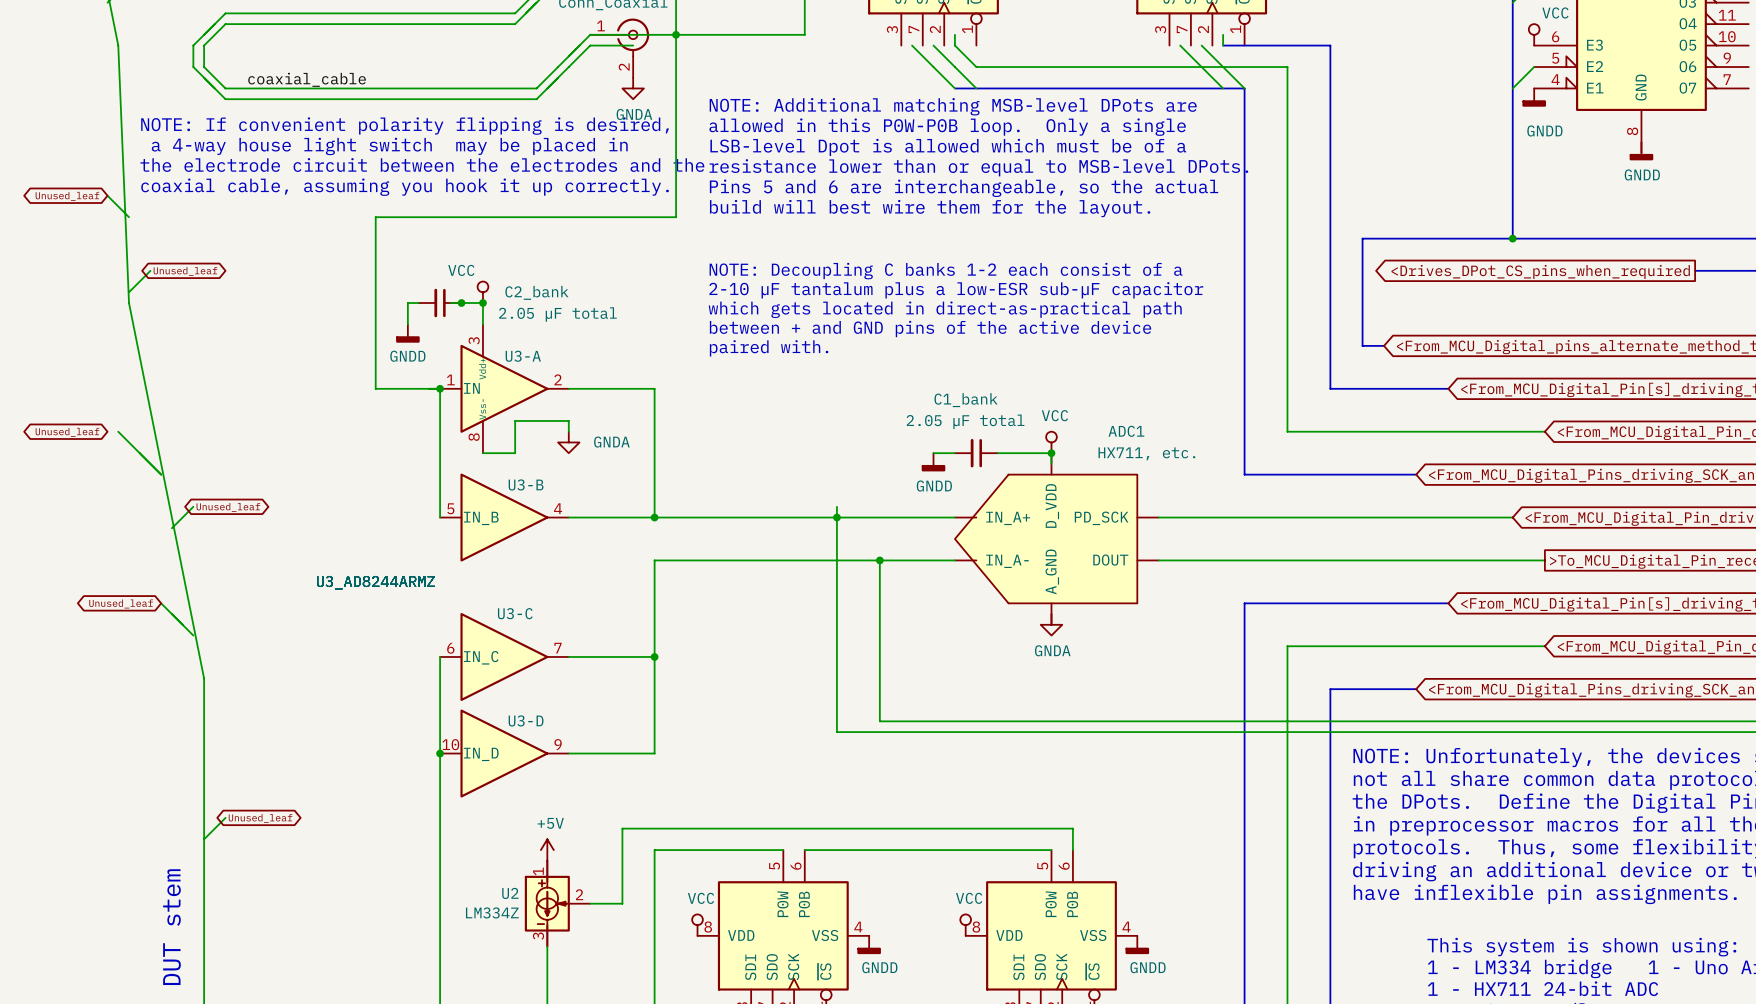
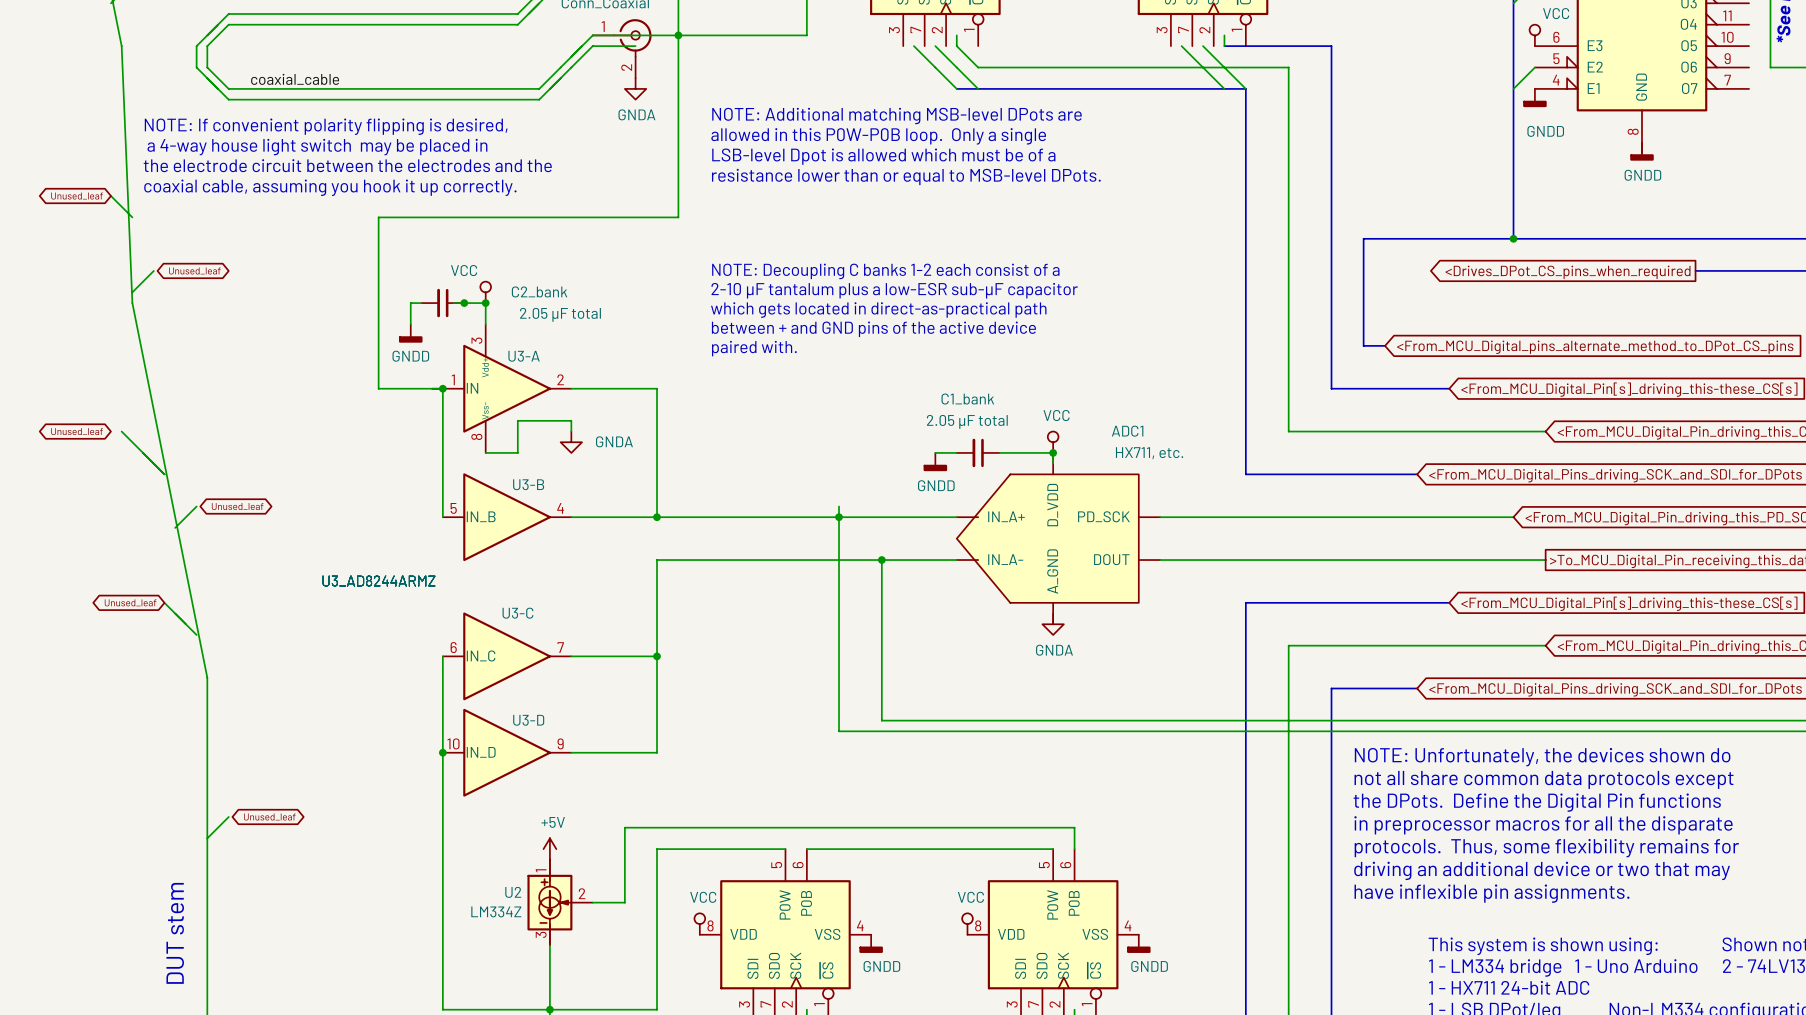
text position: NOTE: Additional matching MSB-level DPots are (953, 106) -> NOTE: Additional matching MSB-level DPots are (896, 116)
text position: allowed in this P0W-P0B loop. Only a single (947, 127) -> allowed in this P0W-P0B loop. Only a single (878, 136)
text position: LSB-level Dpot is allowed which must be of a (948, 147) -> LSB-level Dpot is allowed which must be of a (883, 156)
text position: resistance lower than or equal to MSB-level DPots. (978, 167) -> resistance lower than or equal to MSB-level DPots. (906, 176)
text: Pins 5 and 6 are interchangeable, so the actual (964, 188) -> none
text: build will best wire them for the layout. (930, 208) -> none

